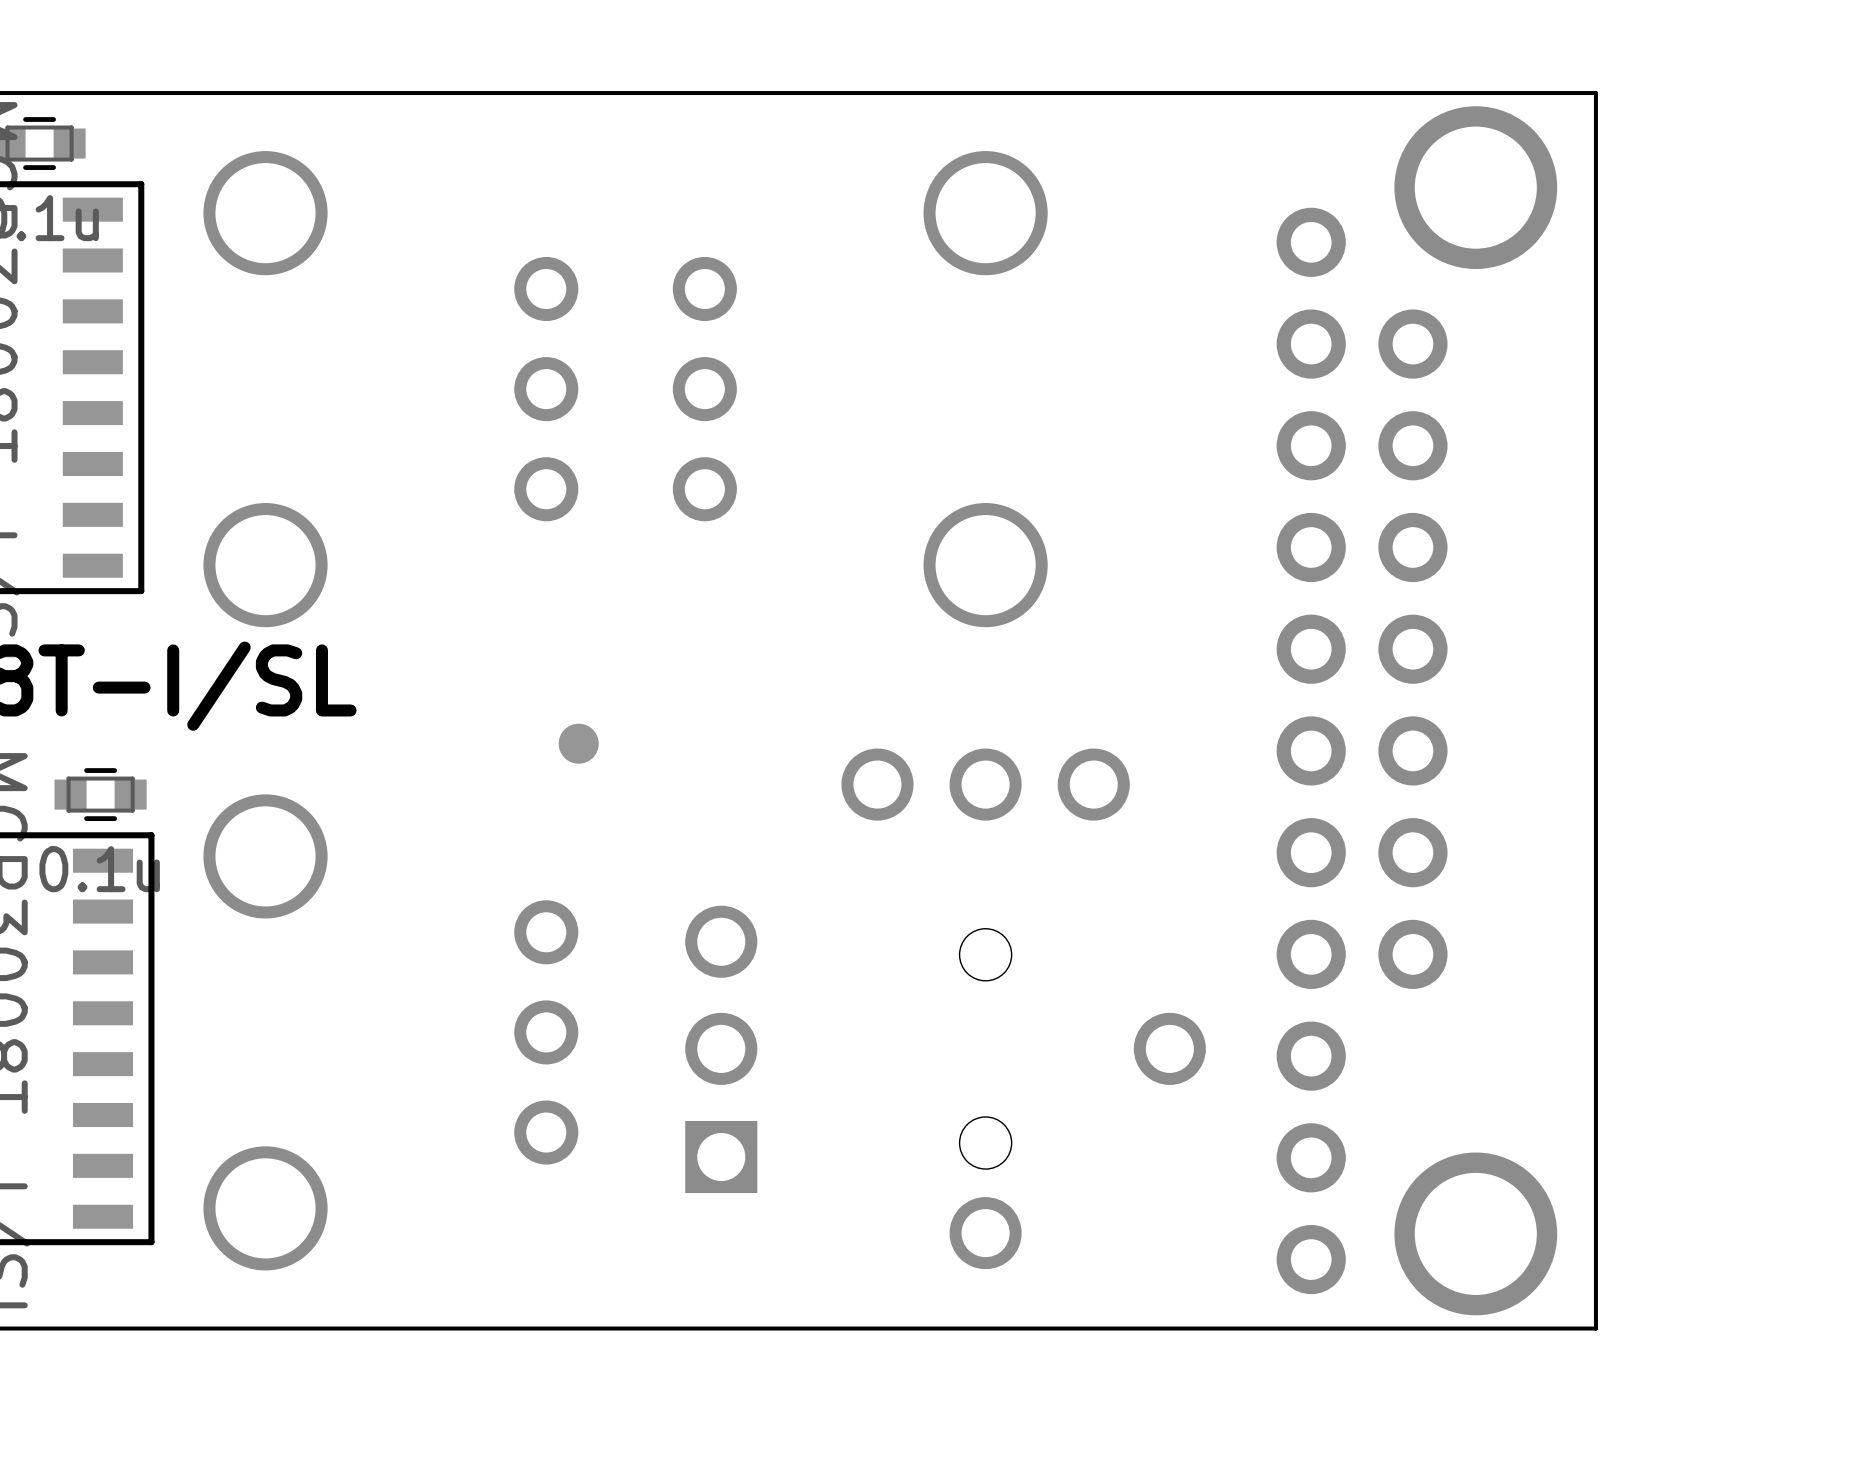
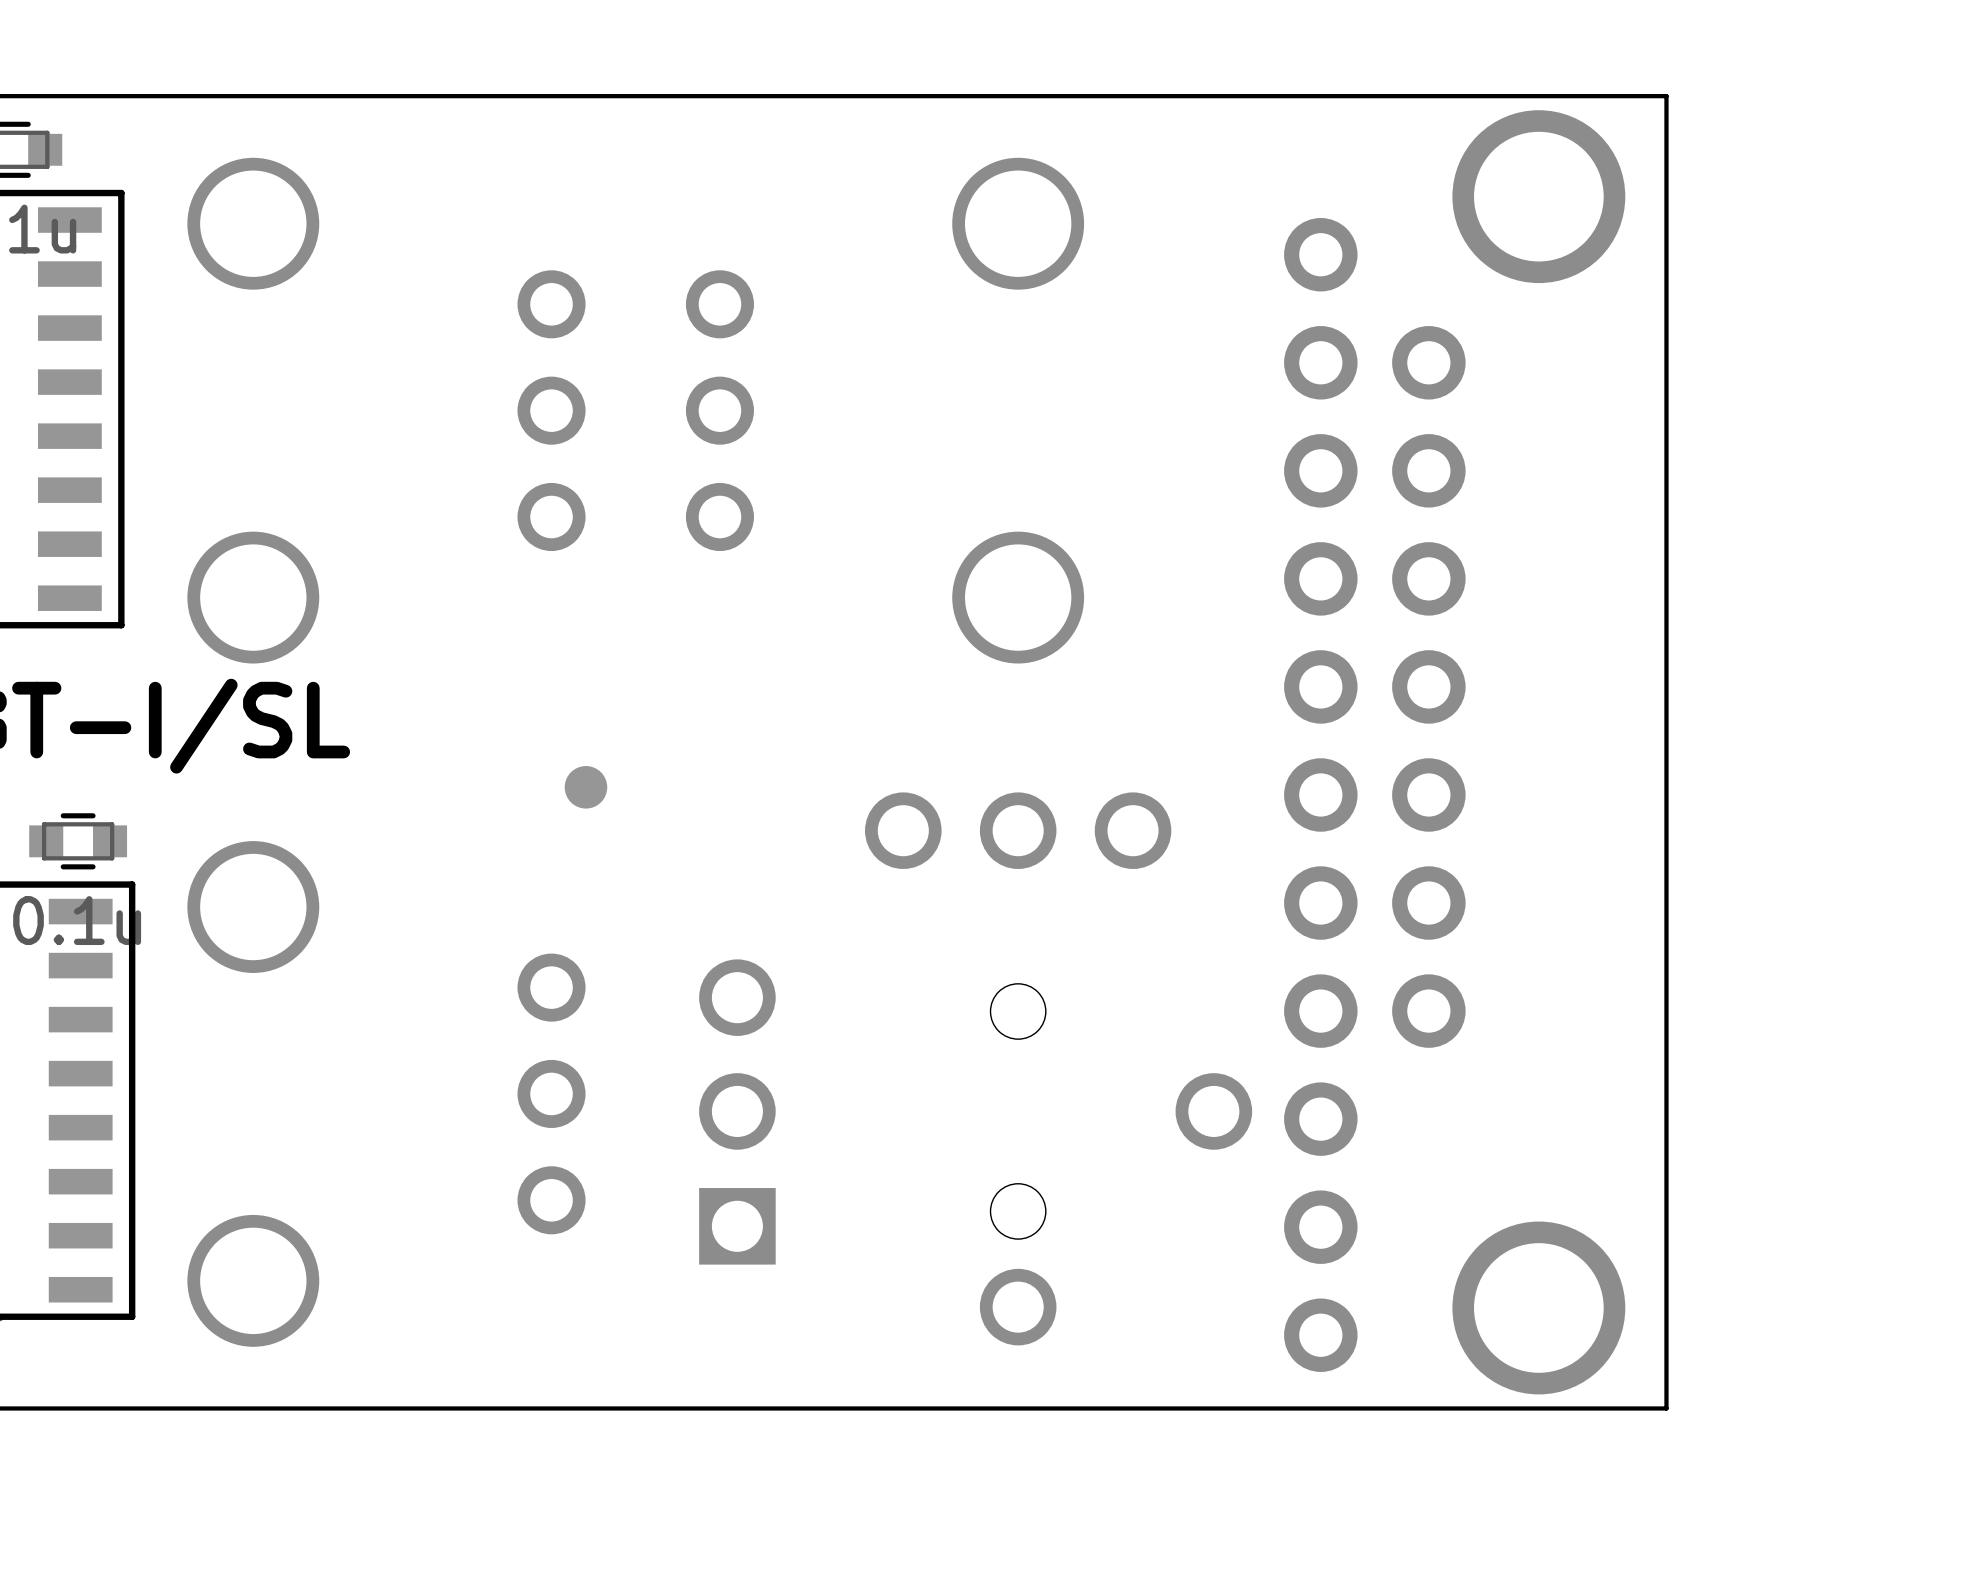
part position: (1311, 242) -> (1320, 254)
part position: (1362, 344) -> (1374, 362)
part position: (1362, 445) -> (1374, 470)
part position: (1362, 547) -> (1374, 578)
part position: (1362, 649) -> (1374, 686)
part position: (1362, 750) -> (1374, 794)
part position: (1362, 852) -> (1374, 903)
part position: (1362, 954) -> (1374, 1011)
part position: (1311, 1056) -> (1320, 1119)
part position: (1311, 1157) -> (1320, 1227)
part position: (1311, 1259) -> (1320, 1335)

